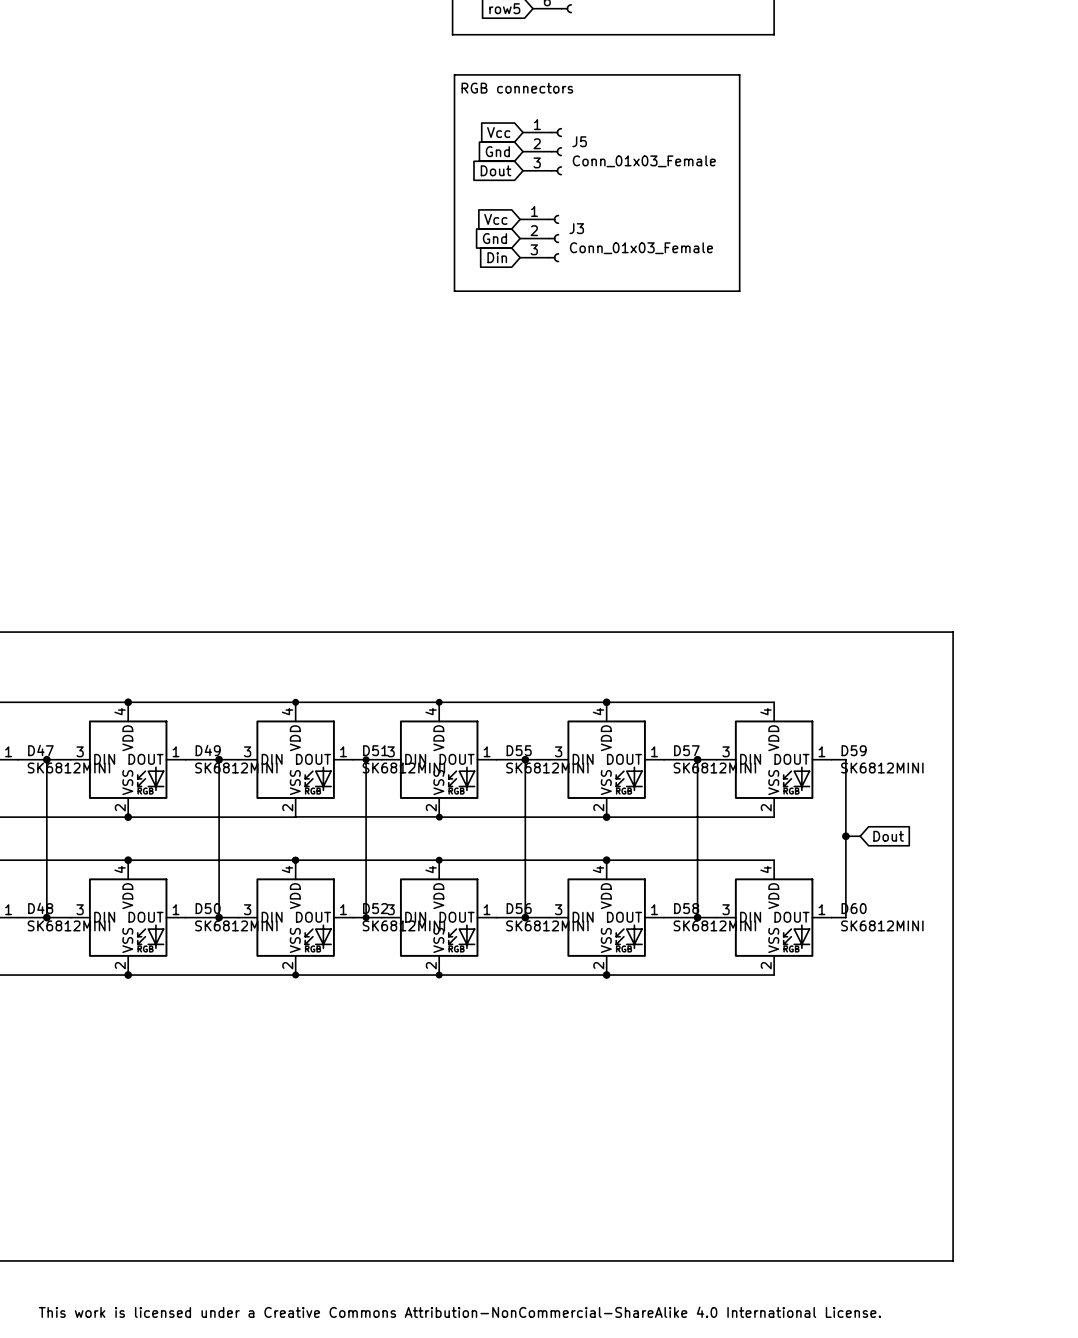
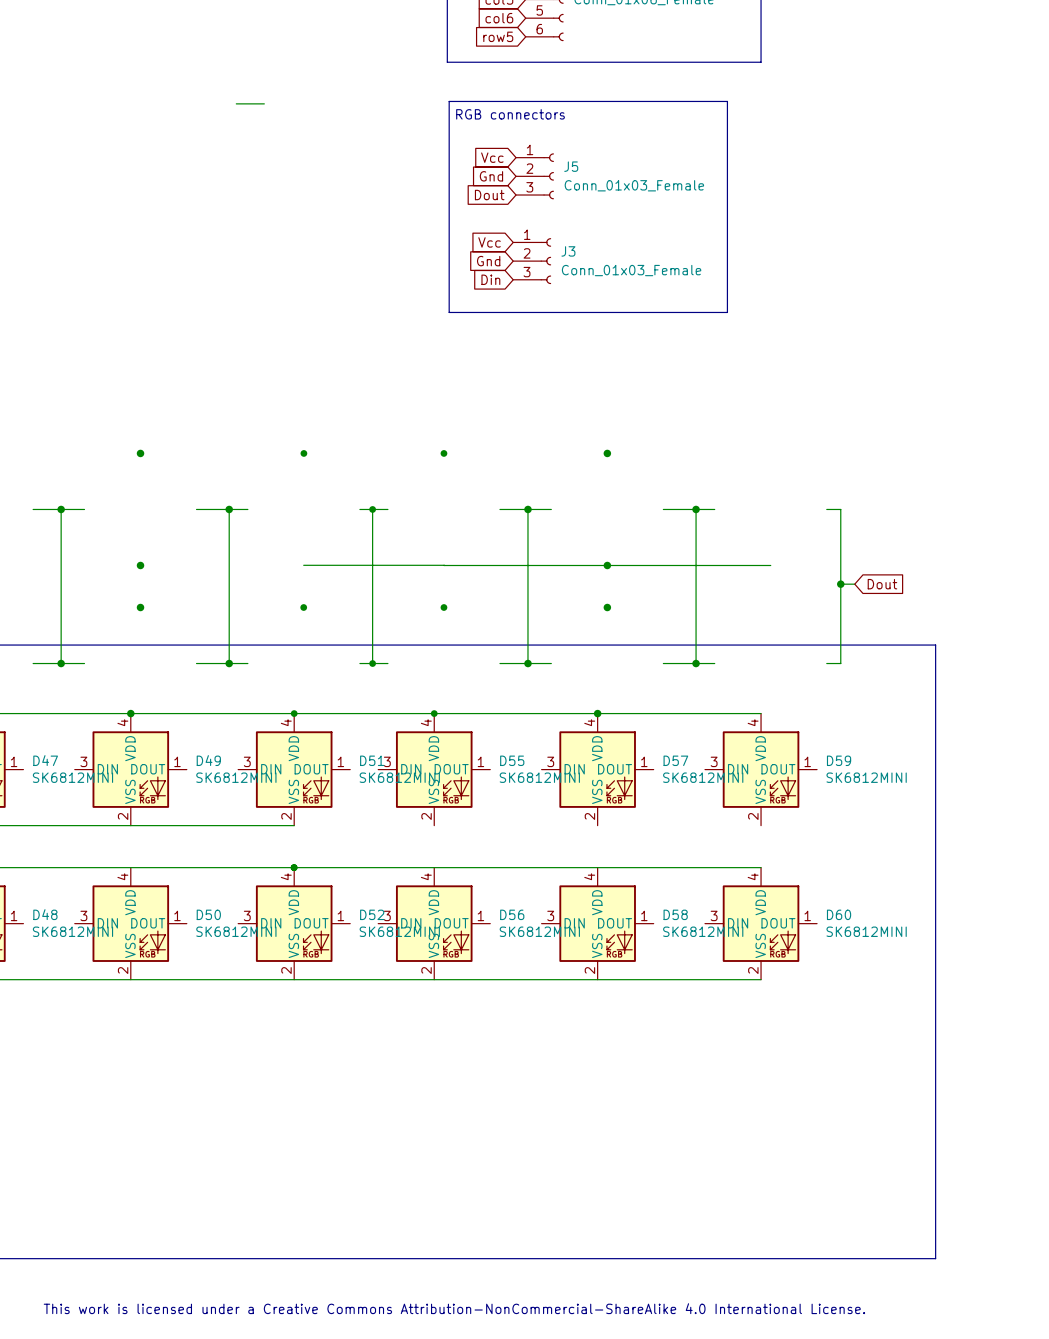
wire: none -> (236, 103) (264, 103)
junction: none -> (140, 453)
junction: none -> (303, 453)
junction: none -> (443, 453)
junction: none -> (607, 453)
wire: none -> (33, 509) (84, 509)
wire: none -> (61, 509) (61, 663)
junction: none -> (61, 509)
wire: none -> (196, 509) (247, 509)
wire: none -> (229, 509) (229, 663)
junction: none -> (229, 509)
wire: none -> (359, 509) (387, 509)
wire: none -> (372, 509) (372, 663)
junction: none -> (372, 509)
wire: none -> (499, 509) (551, 509)
wire: none -> (527, 509) (527, 663)
junction: none -> (527, 509)
wire: none -> (663, 509) (714, 509)
wire: none -> (696, 509) (696, 663)
junction: none -> (696, 509)
wire: none -> (826, 509) (840, 509) (840, 663) (826, 663)
junction: none -> (140, 565)
wire: none -> (303, 565) (444, 565)
wire: none -> (443, 565) (770, 565)
junction: none -> (607, 565)
wire: none -> (840, 584) (854, 584)
junction: none -> (840, 584)
global label: none -> Dout (882, 584)
junction: none -> (140, 607)
junction: none -> (303, 607)
junction: none -> (443, 607)
junction: none -> (607, 607)
junction: none -> (61, 663)
junction: none -> (229, 663)
junction: none -> (372, 663)
junction: none -> (527, 663)
junction: none -> (696, 663)
wire: (18, 759) (70, 759) -> (33, 663) (84, 663)
wire: (46, 759) (46, 917) -> none
junction: (46, 759) -> none
wire: (185, 759) (238, 759) -> (196, 663) (247, 663)
wire: (219, 759) (219, 917) -> none
junction: (219, 759) -> none
wire: (353, 759) (381, 759) -> (359, 663) (387, 663)
wire: (366, 759) (366, 917) -> none
junction: (366, 759) -> none
wire: (496, 759) (549, 759) -> (499, 663) (551, 663)
wire: (525, 759) (525, 917) -> none
junction: (525, 759) -> none
wire: (664, 759) (716, 759) -> (663, 663) (714, 663)
wire: (697, 759) (697, 917) -> none
junction: (697, 759) -> none
wire: (831, 759) (845, 759) (845, 917) (831, 917) -> none
wire: (295, 816) (439, 817) -> none
junction: (128, 817) -> none
wire: (439, 817) (774, 817) -> none
junction: (439, 817) -> none
junction: (606, 817) -> none
wire: (845, 836) (860, 836) -> none
junction: (845, 836) -> none
global label: Dout (888, 836) -> none
junction: (128, 860) -> none
junction: (439, 860) -> none
junction: (606, 860) -> none
wire: (18, 917) (70, 917) -> none
junction: (46, 917) -> none
wire: (185, 917) (238, 917) -> none
junction: (219, 917) -> none
wire: (353, 917) (381, 917) -> none
junction: (366, 917) -> none
wire: (496, 917) (549, 917) -> none
junction: (525, 917) -> none
wire: (664, 917) (716, 917) -> none
junction: (697, 917) -> none
junction: (128, 975) -> none
junction: (295, 975) -> none
junction: (439, 975) -> none
junction: (606, 975) -> none

